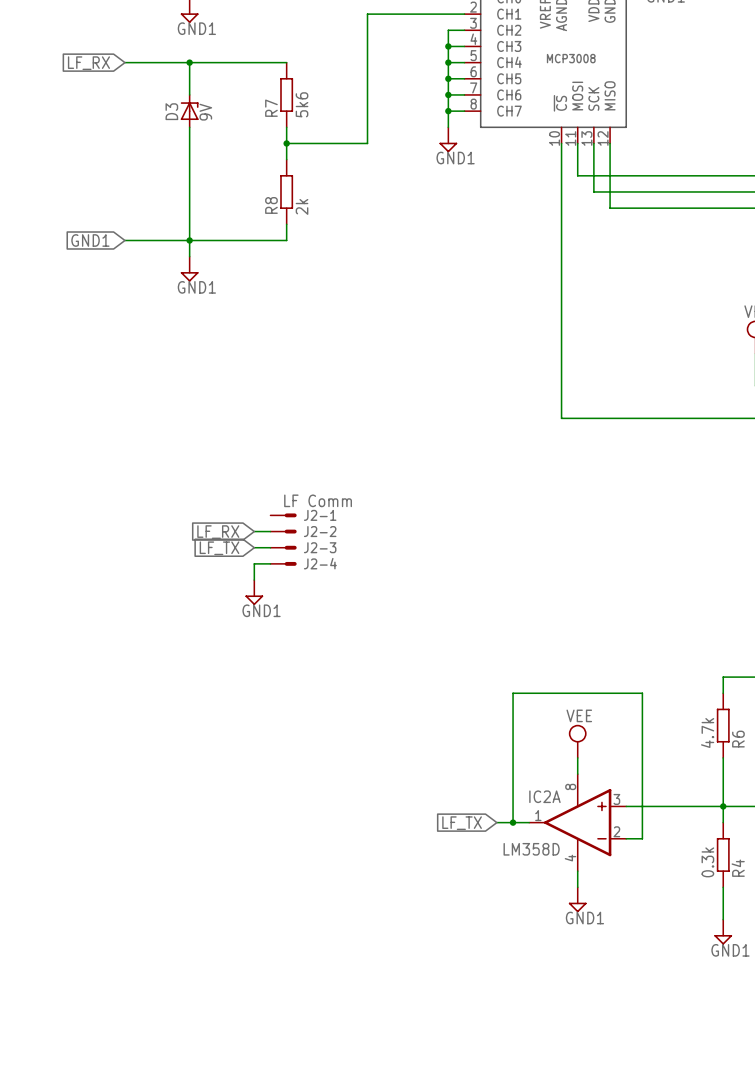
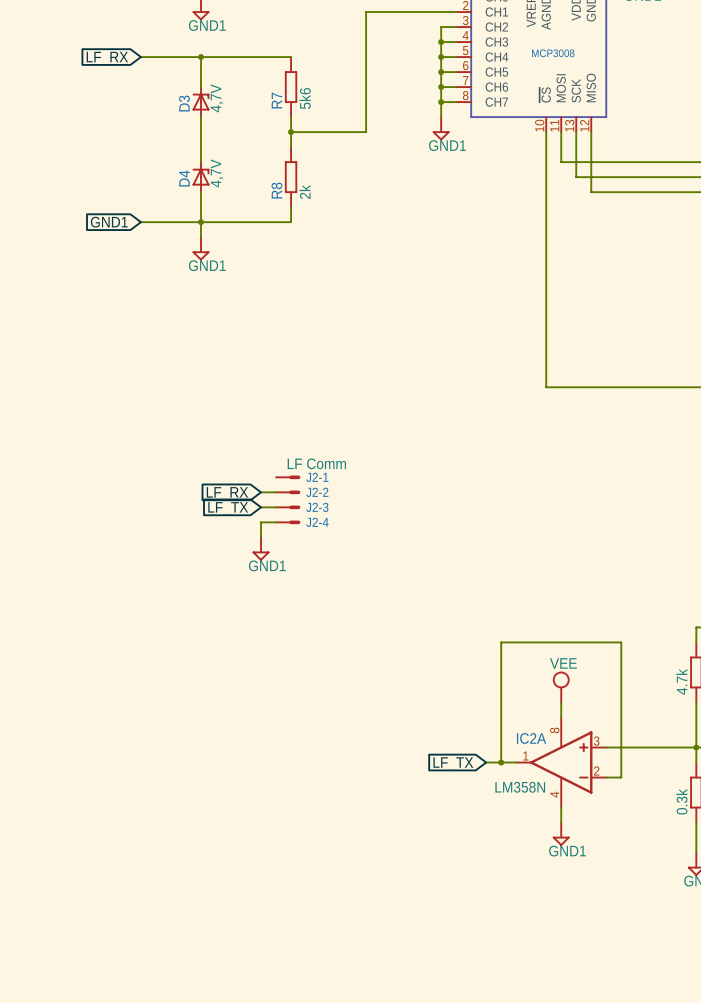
D3 value: 9V (205, 112) -> 4,7V (216, 98)
D4: none -> 4,7V (200, 177)
IC2A value: LM358D (531, 849) -> LM358N (520, 787)

